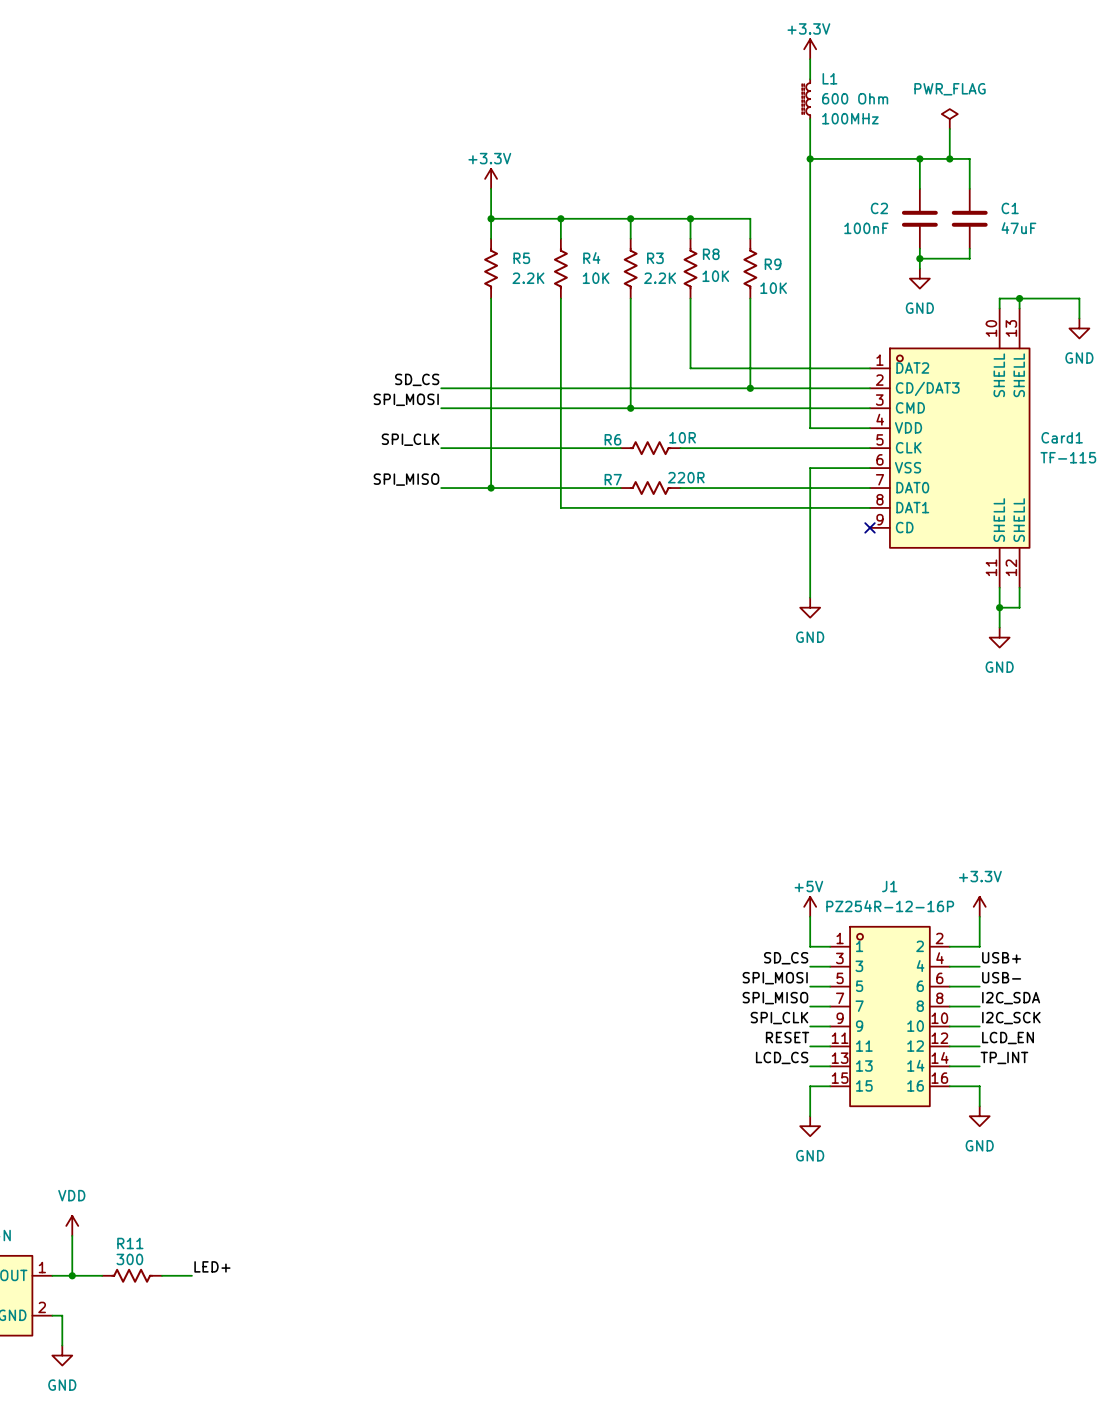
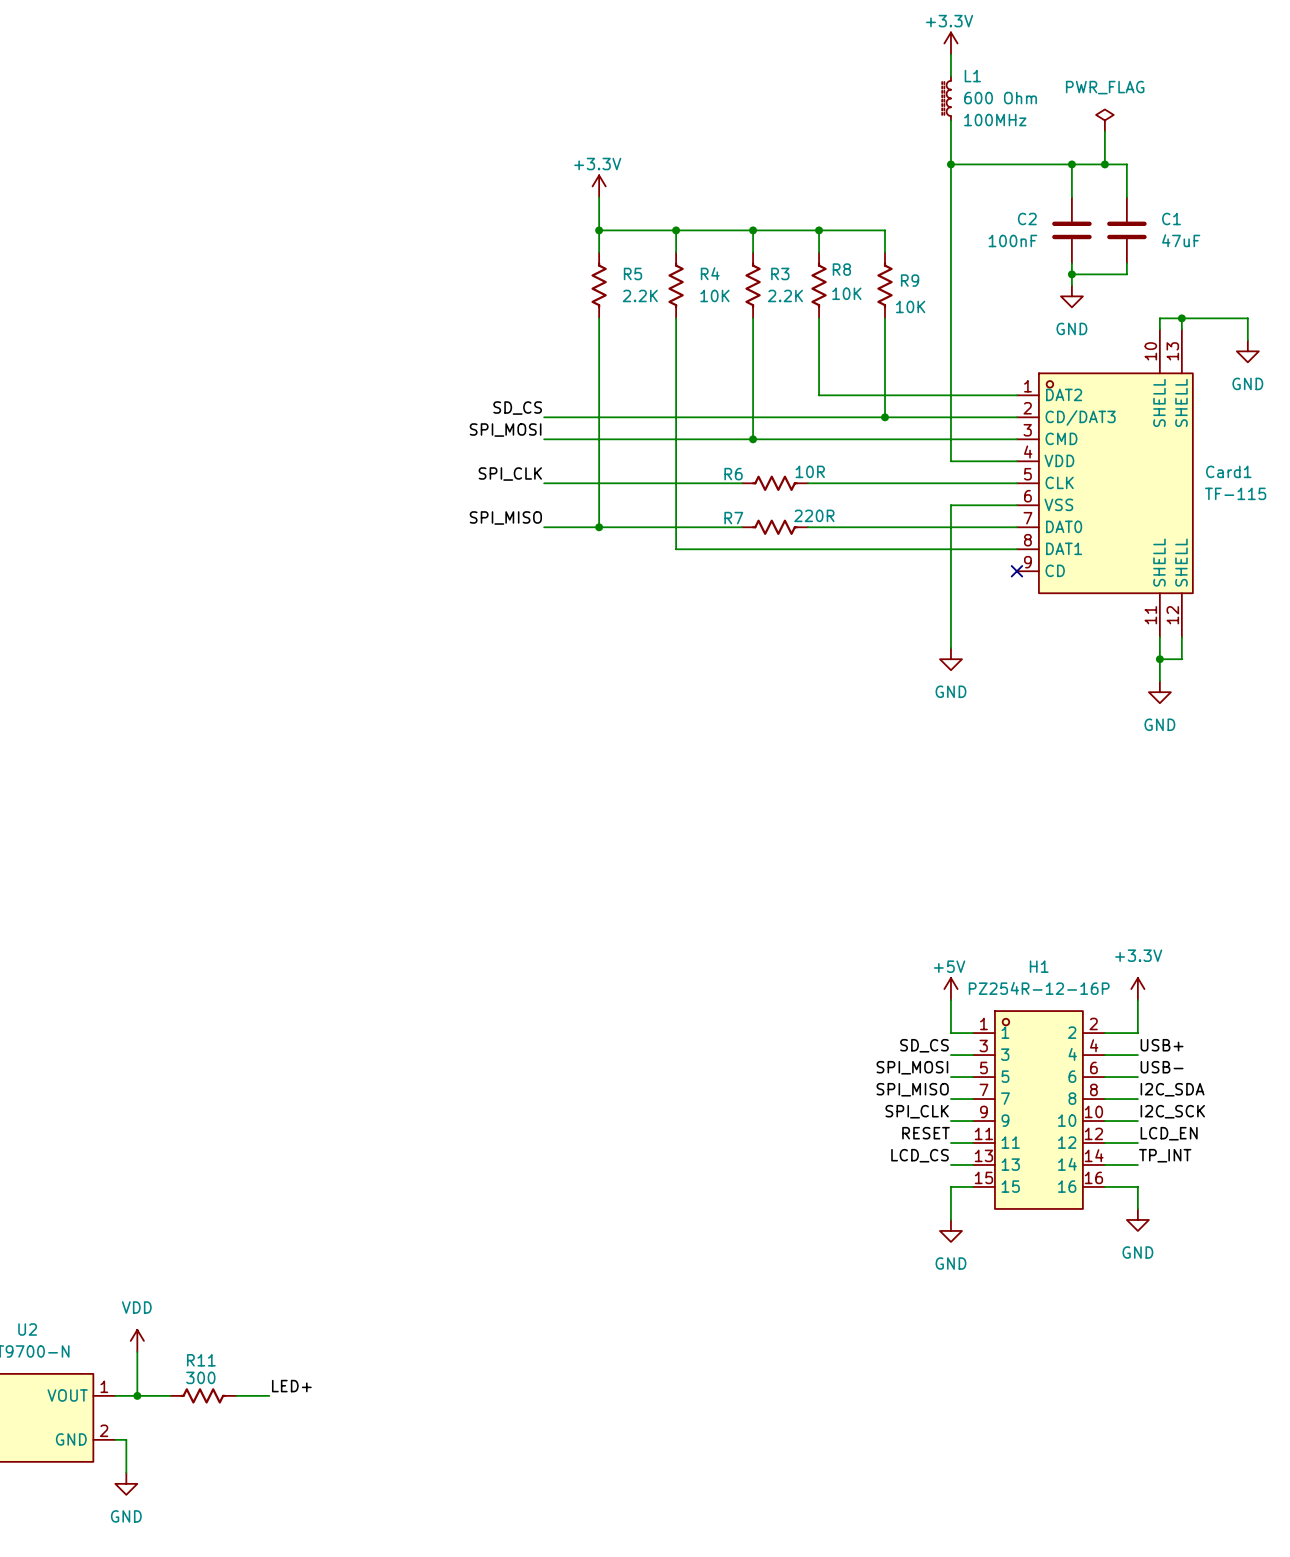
J1 name: J1 (889, 886) -> H1 (1039, 966)

